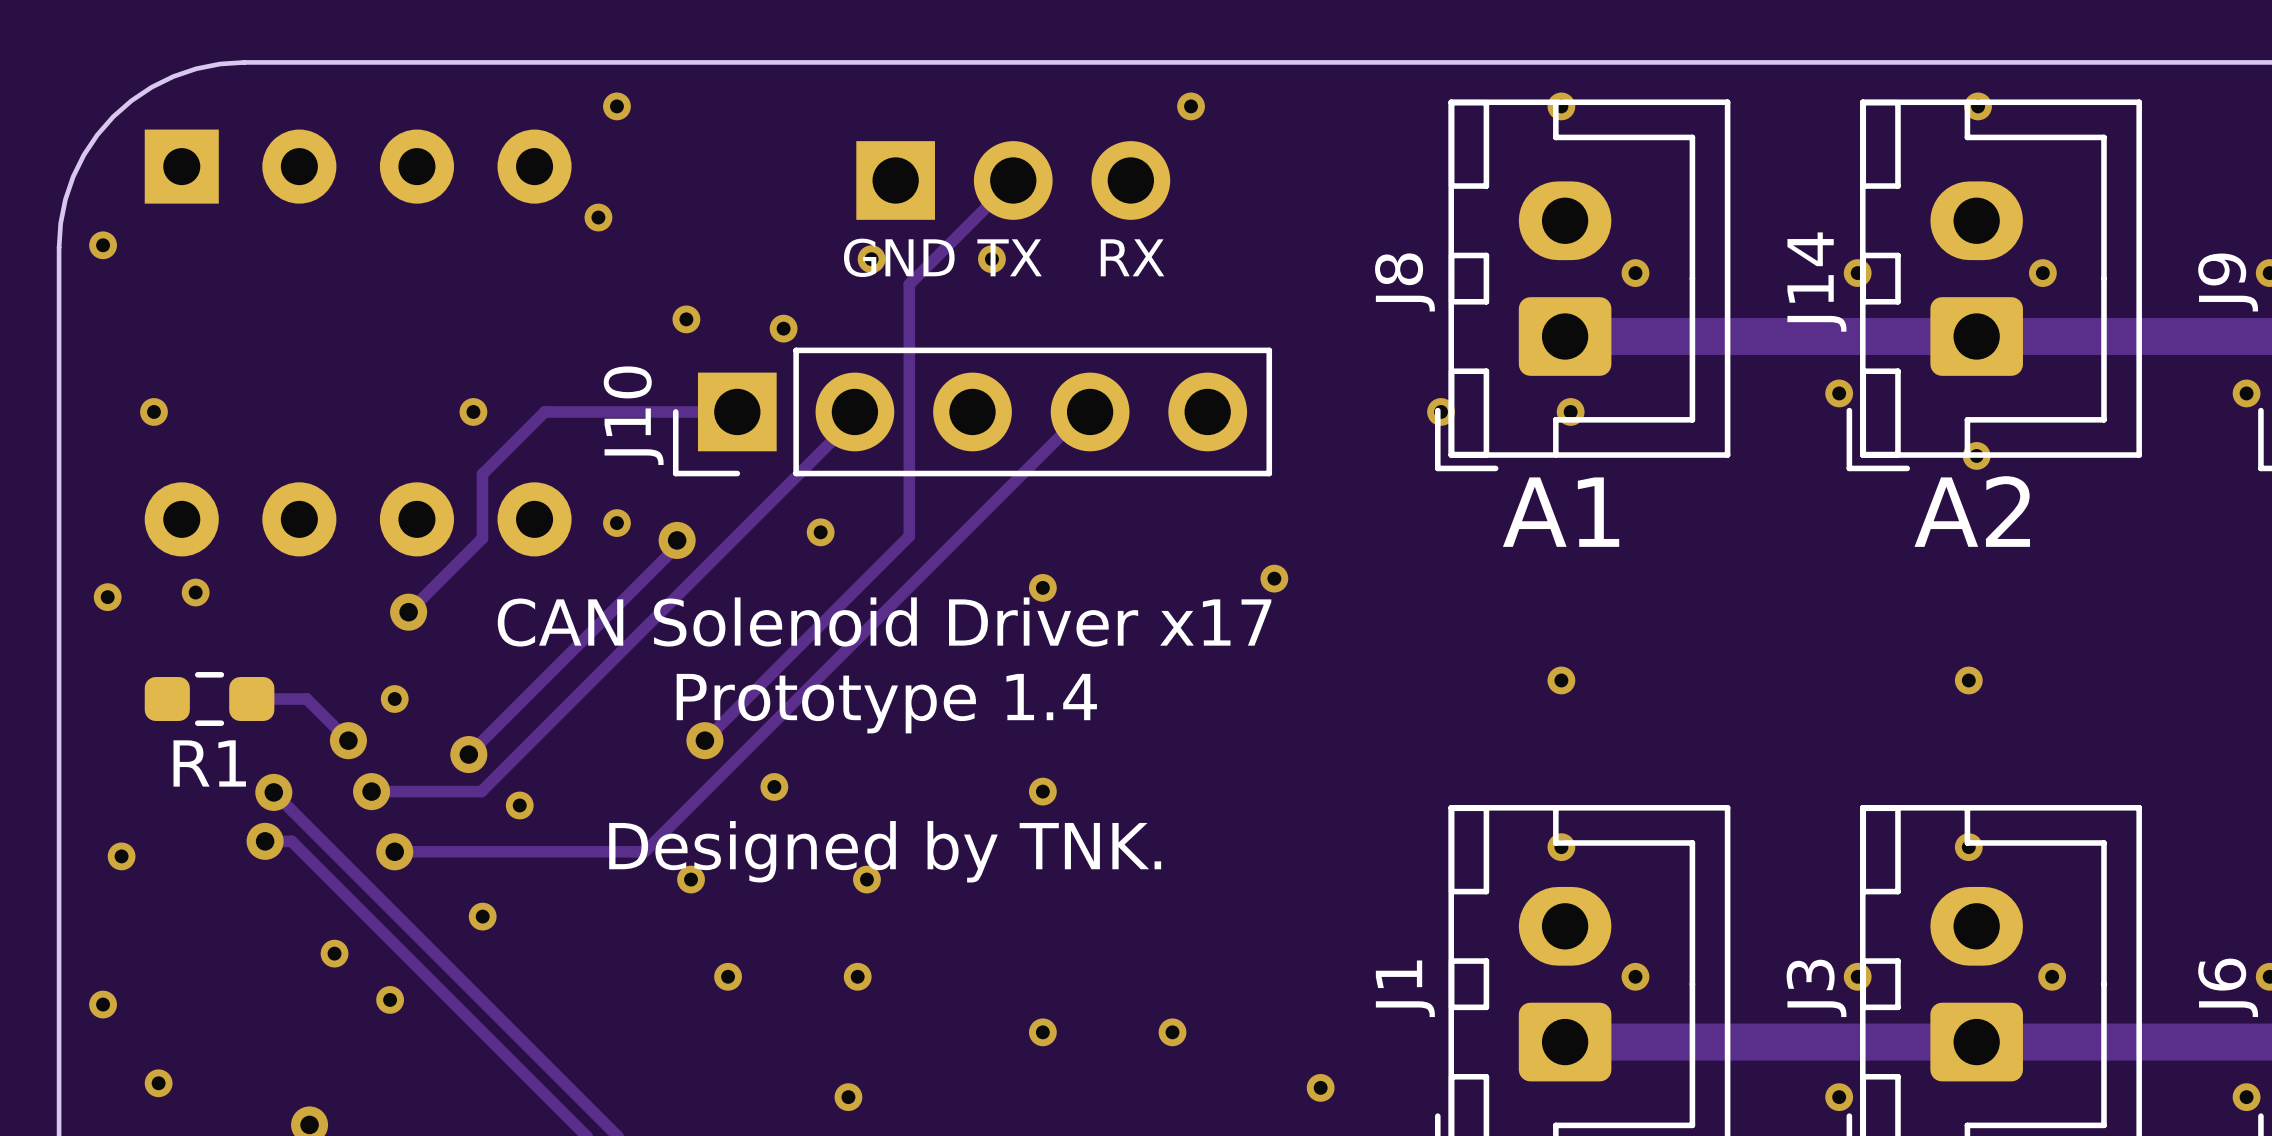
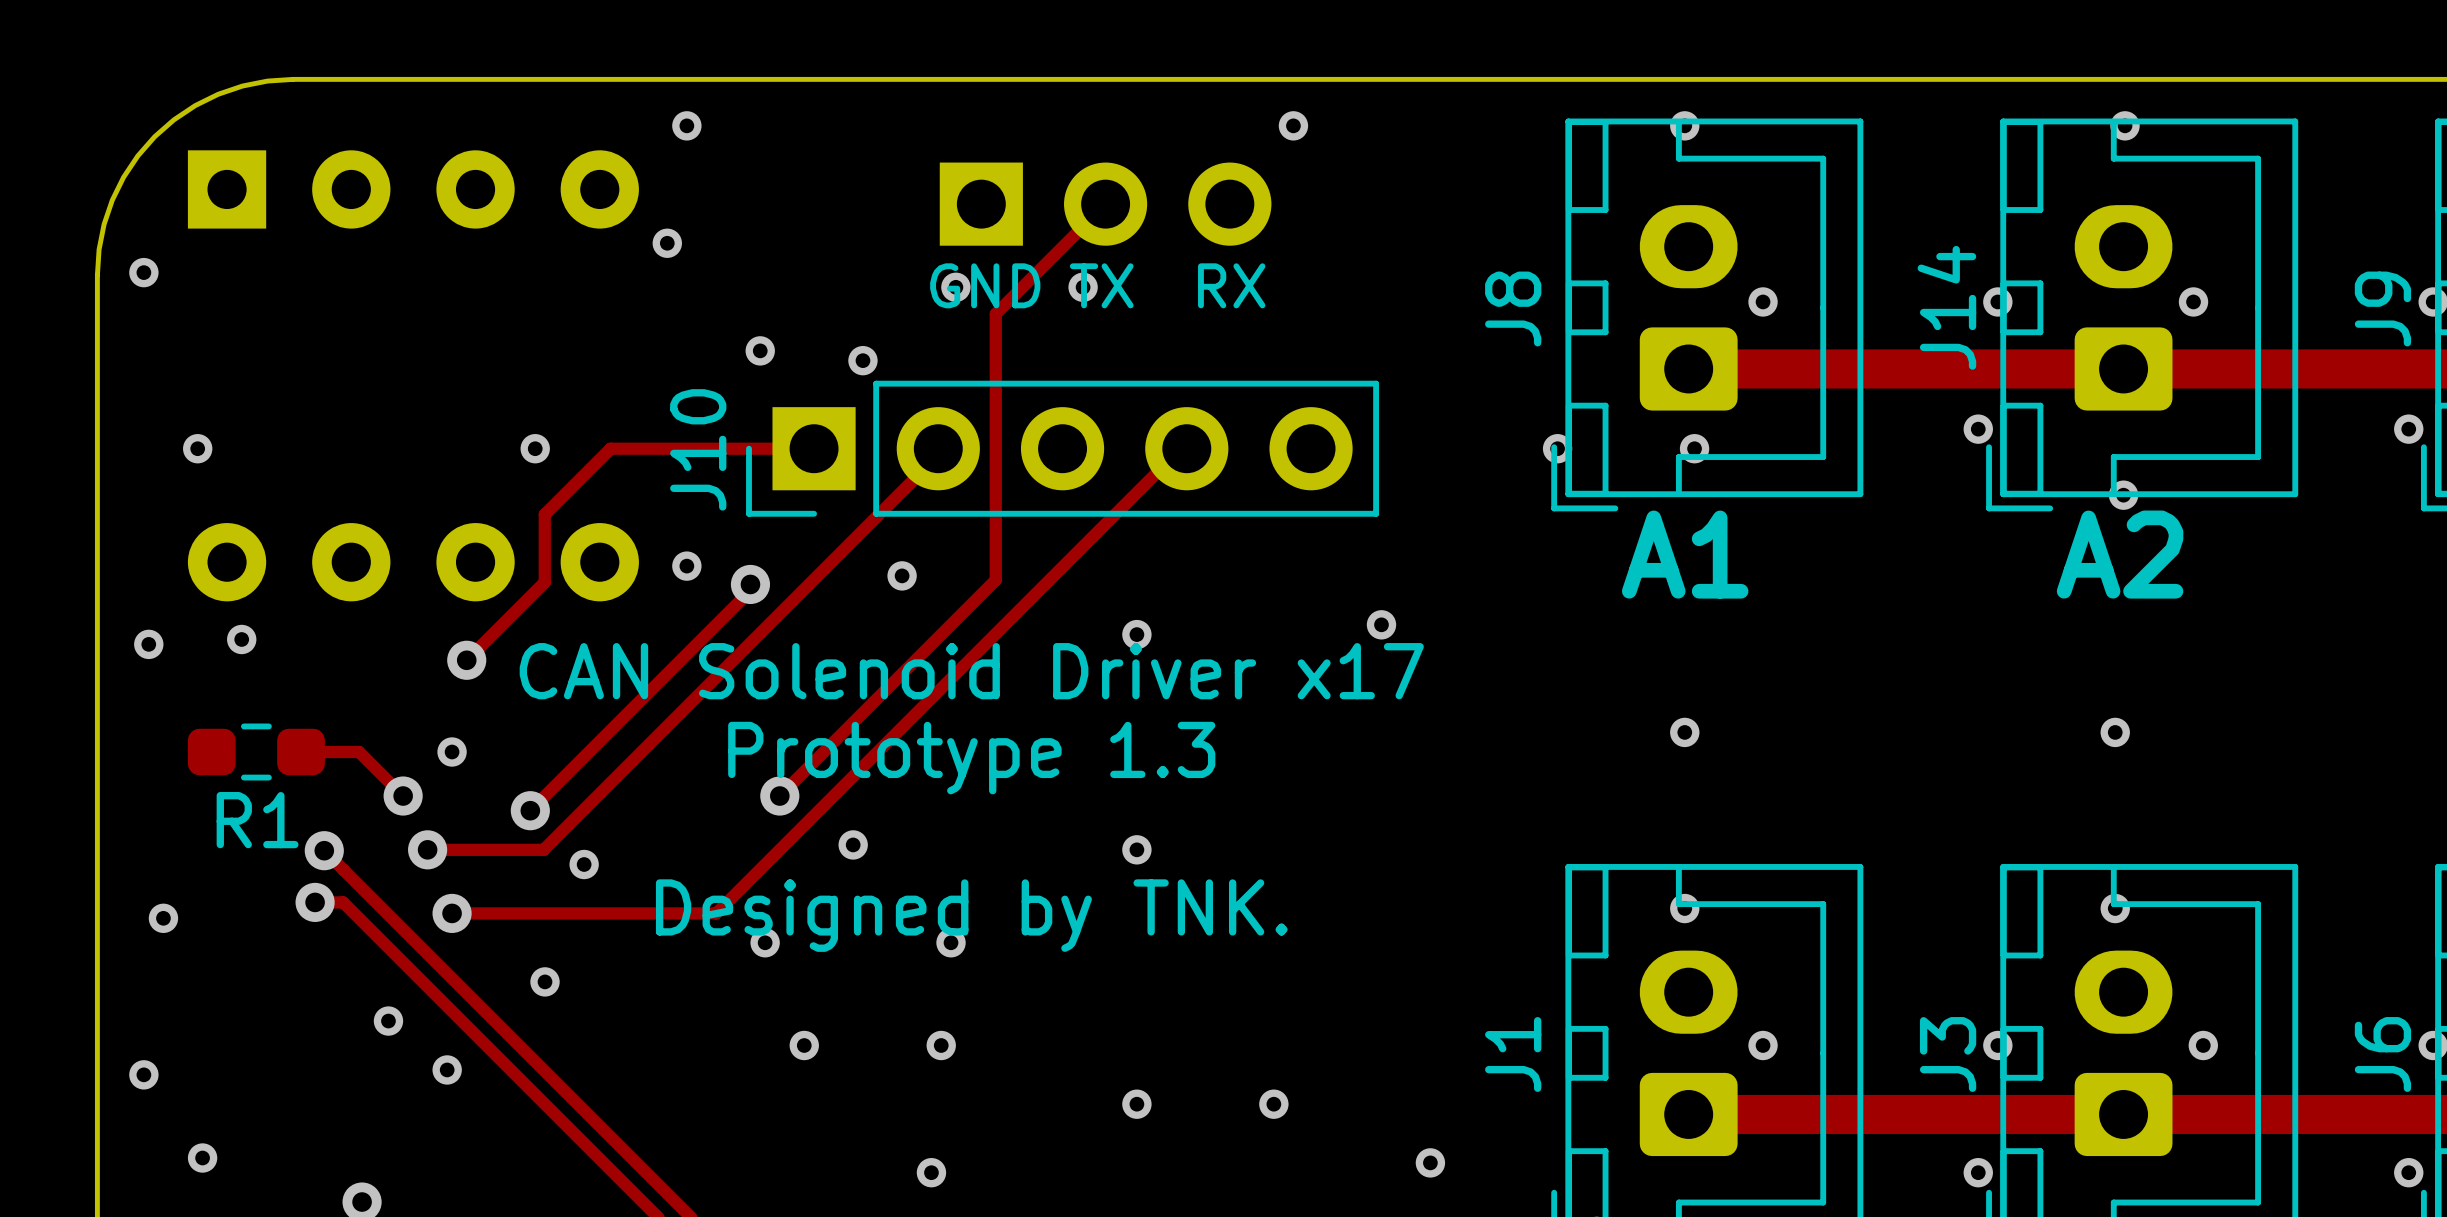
text: Prototype 1.4 (886, 703) -> Prototype 1.3 (971, 758)

